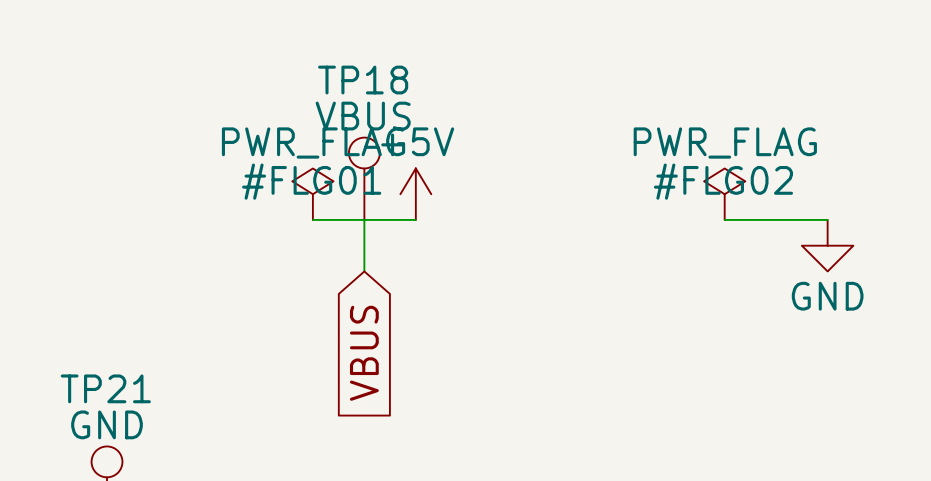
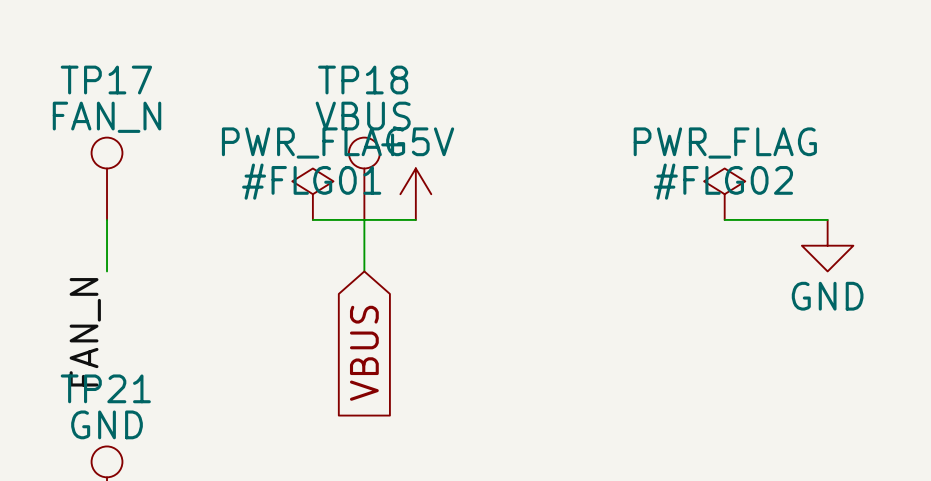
TP17: none -> FAN_N (107, 178)
wire: none -> (107, 219) (107, 271)
label: none -> FAN_N (85, 332)

